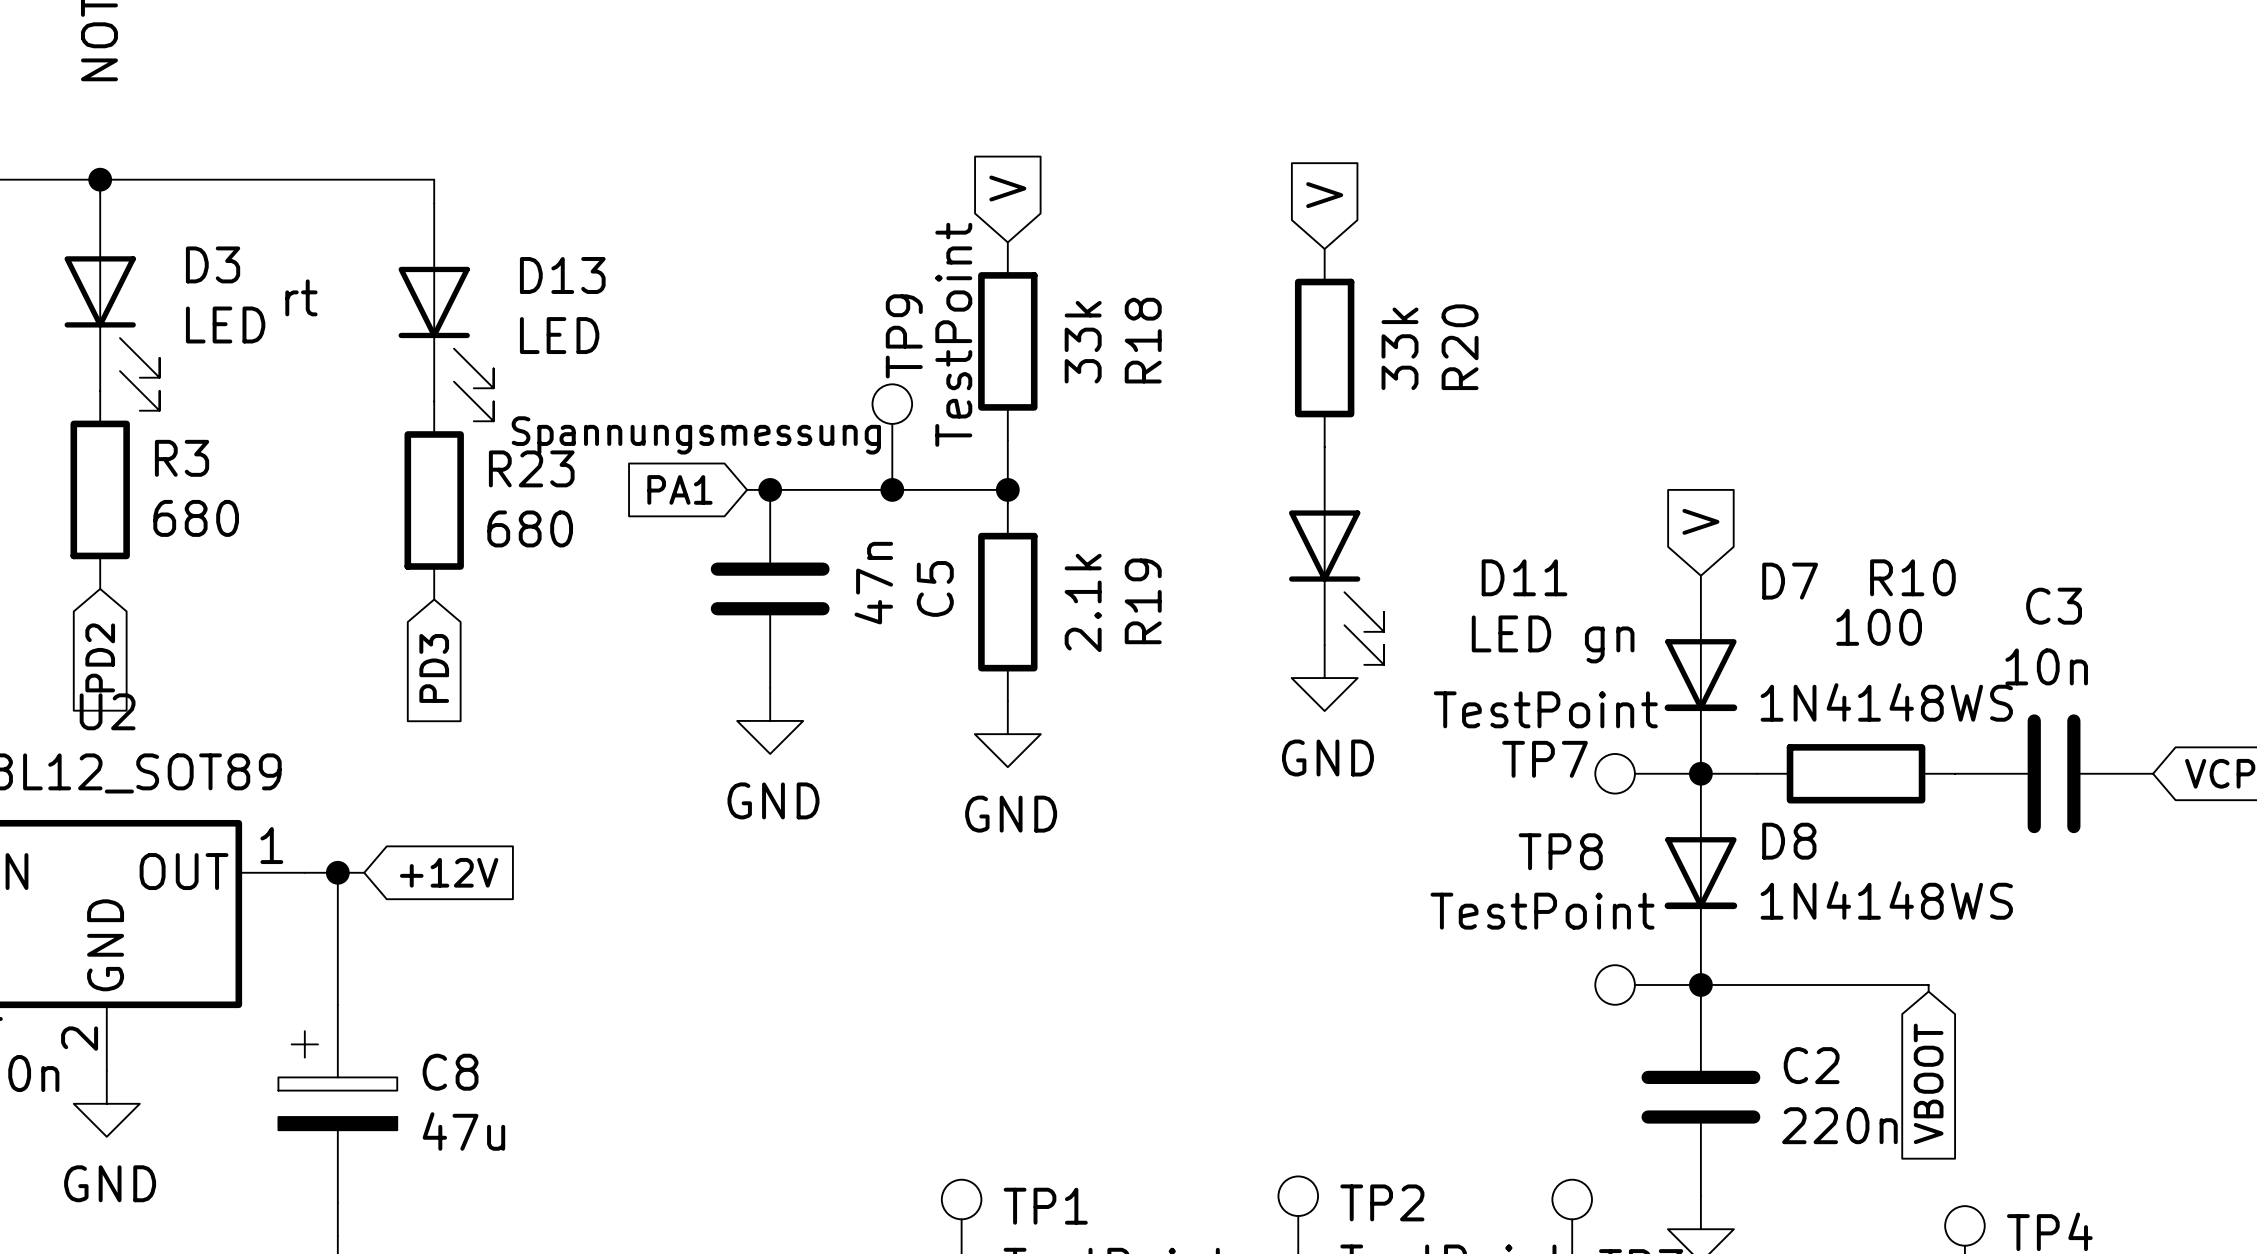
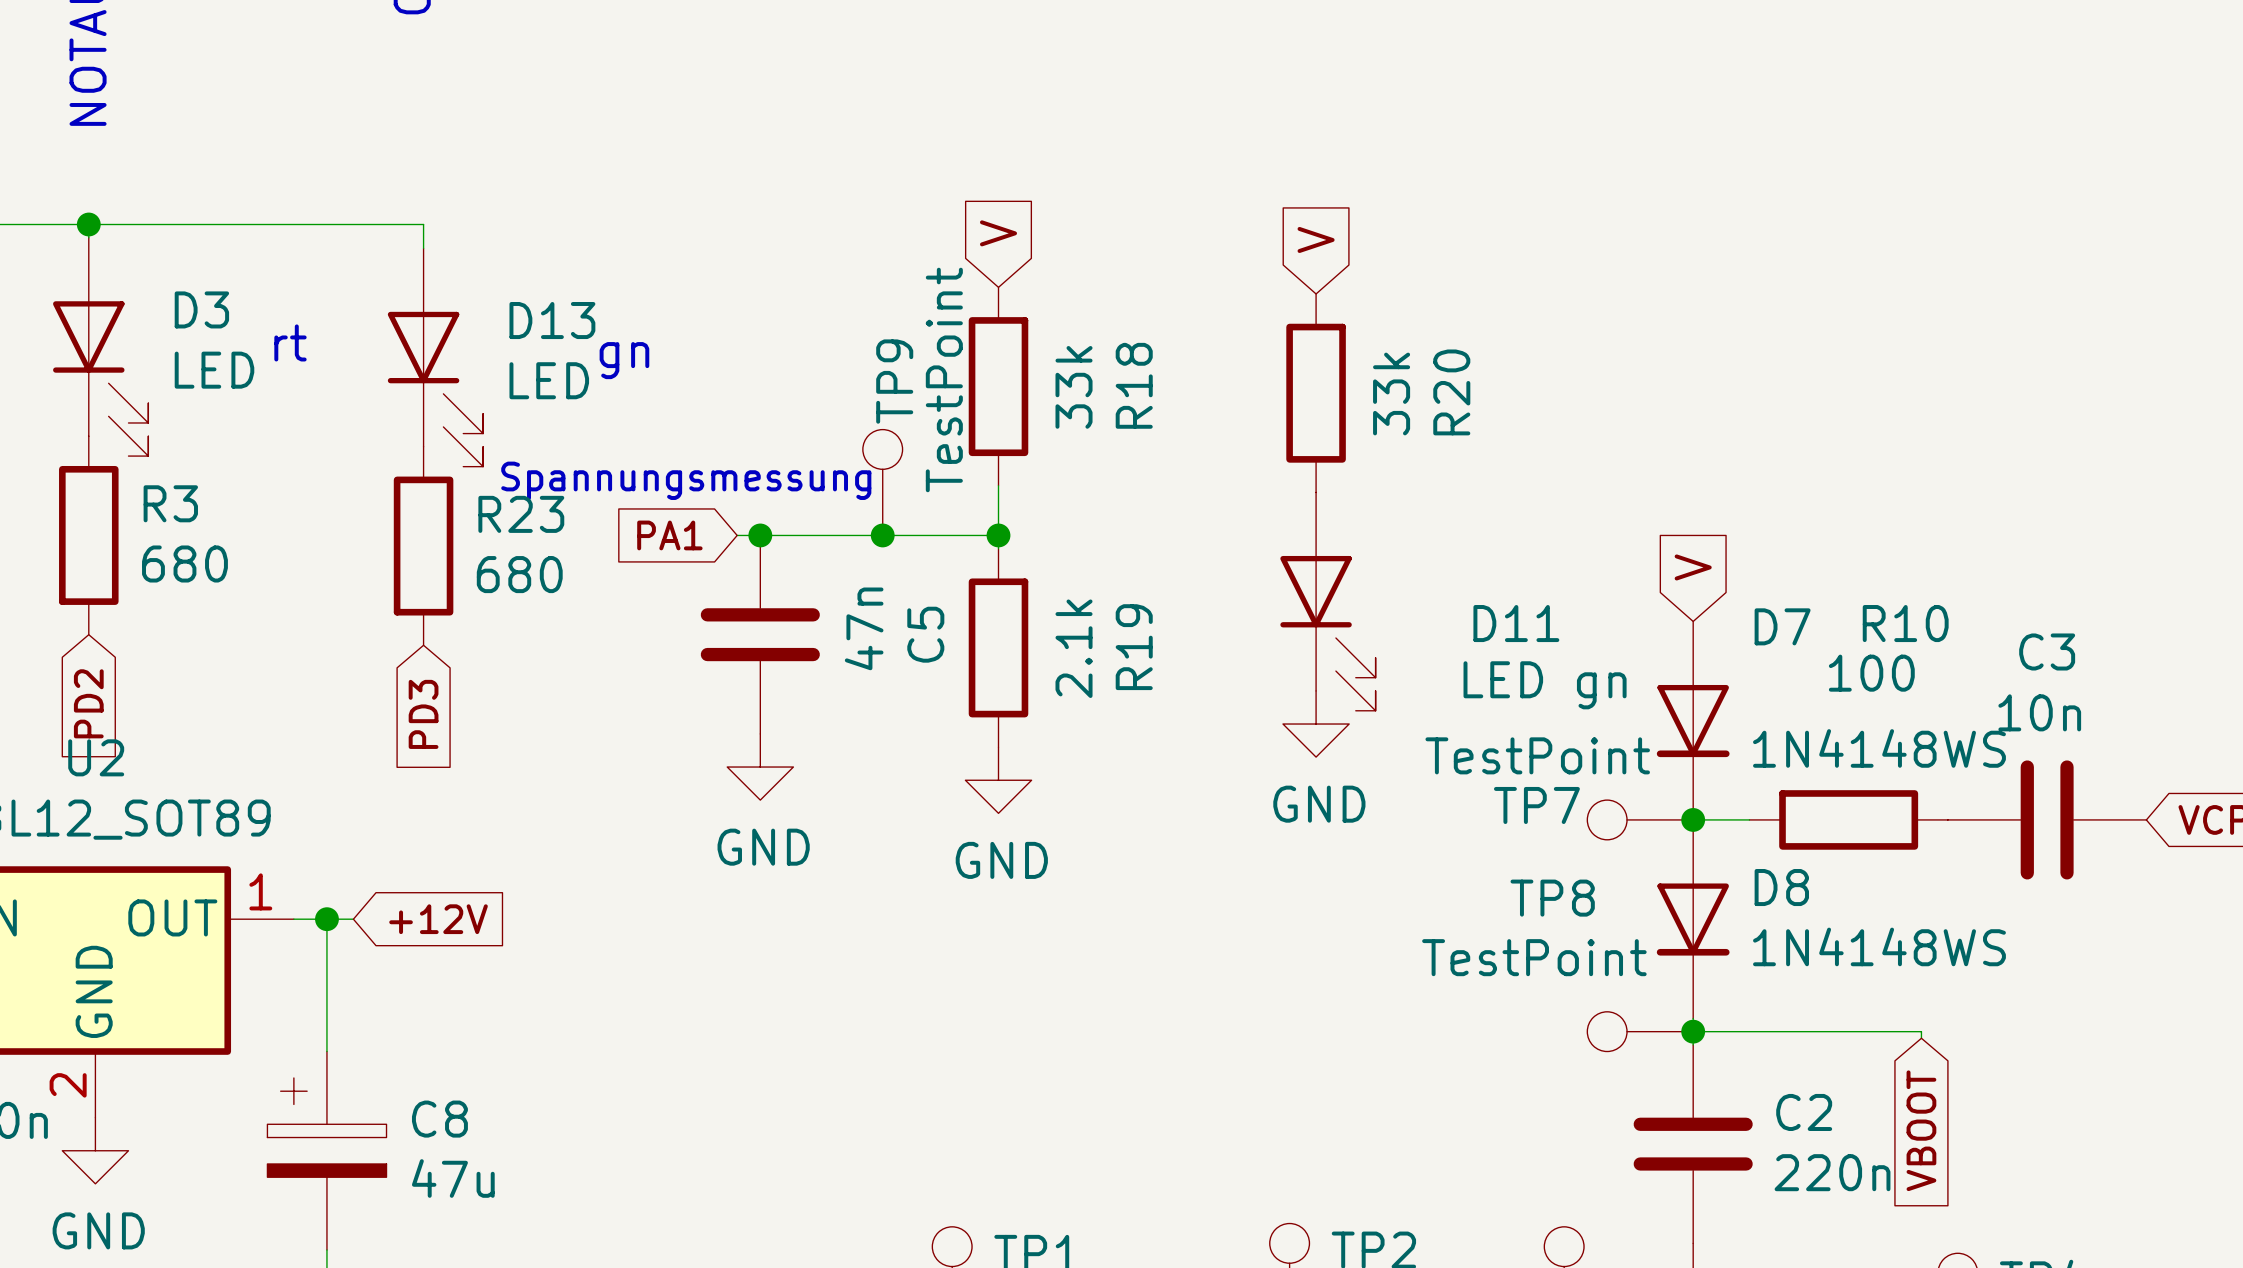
text: none -> gn (624, 360)

